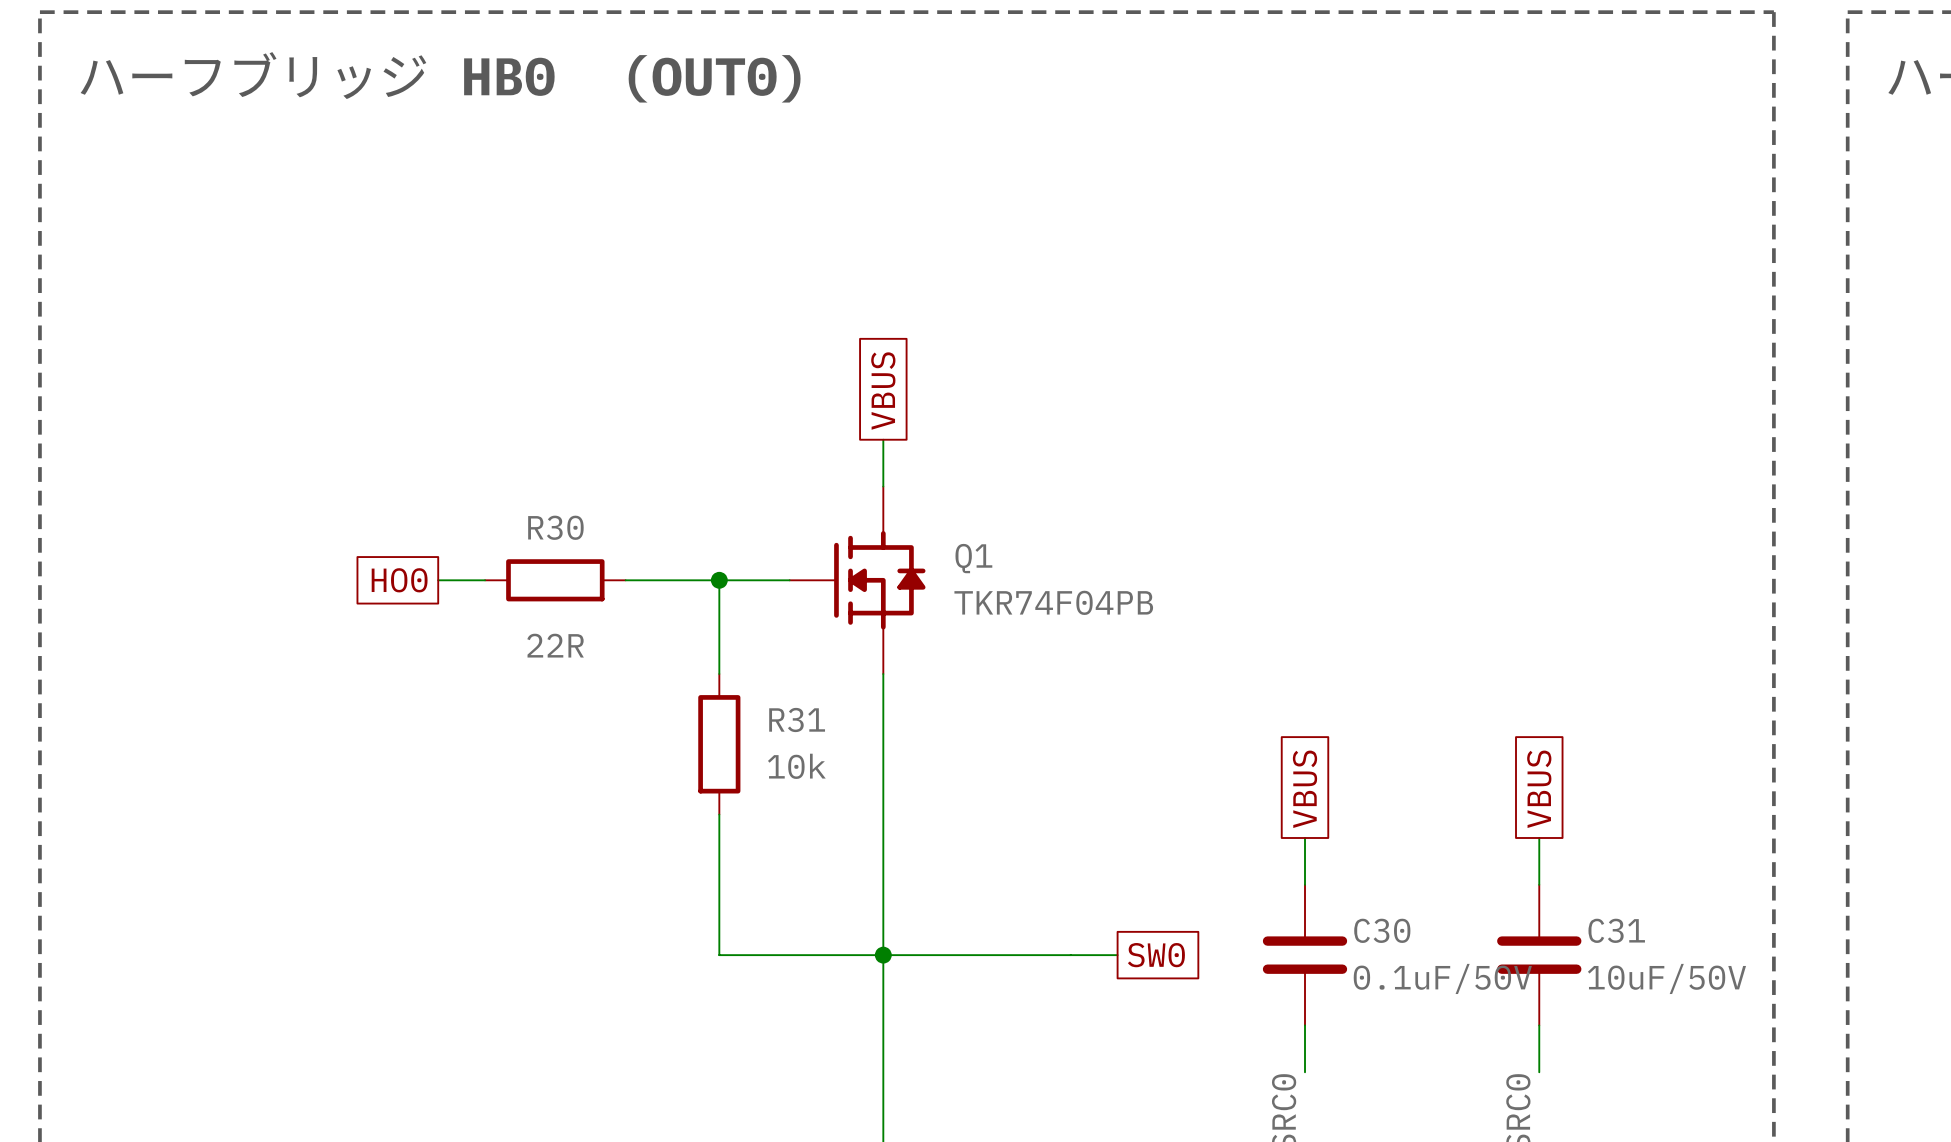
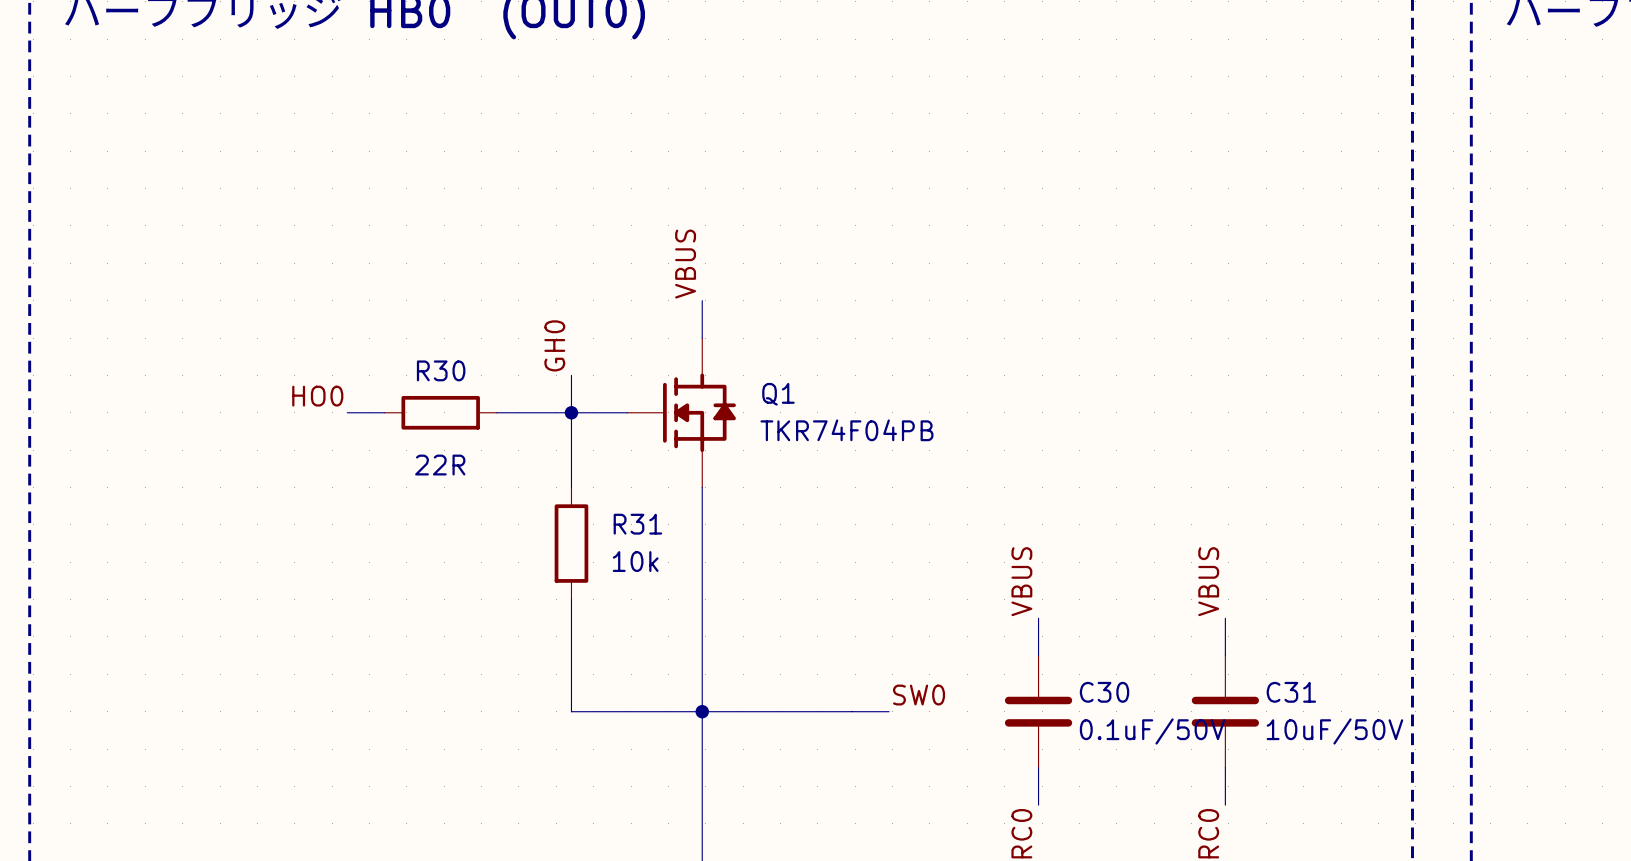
global label: VBUS (883, 391) -> none
label: none -> VBUS (685, 264)
label: none -> GH0 (554, 345)
wire: none -> (571, 375) (571, 412)
label: none -> HO0 (317, 396)
global label: HO0 (399, 580) -> none
global label: VBUS (1305, 789) -> none
global label: VBUS (1539, 789) -> none
label: none -> VBUS (1021, 581)
label: none -> VBUS (1208, 581)
label: none -> SW0 (919, 695)
global label: SW0 (1156, 955) -> none

